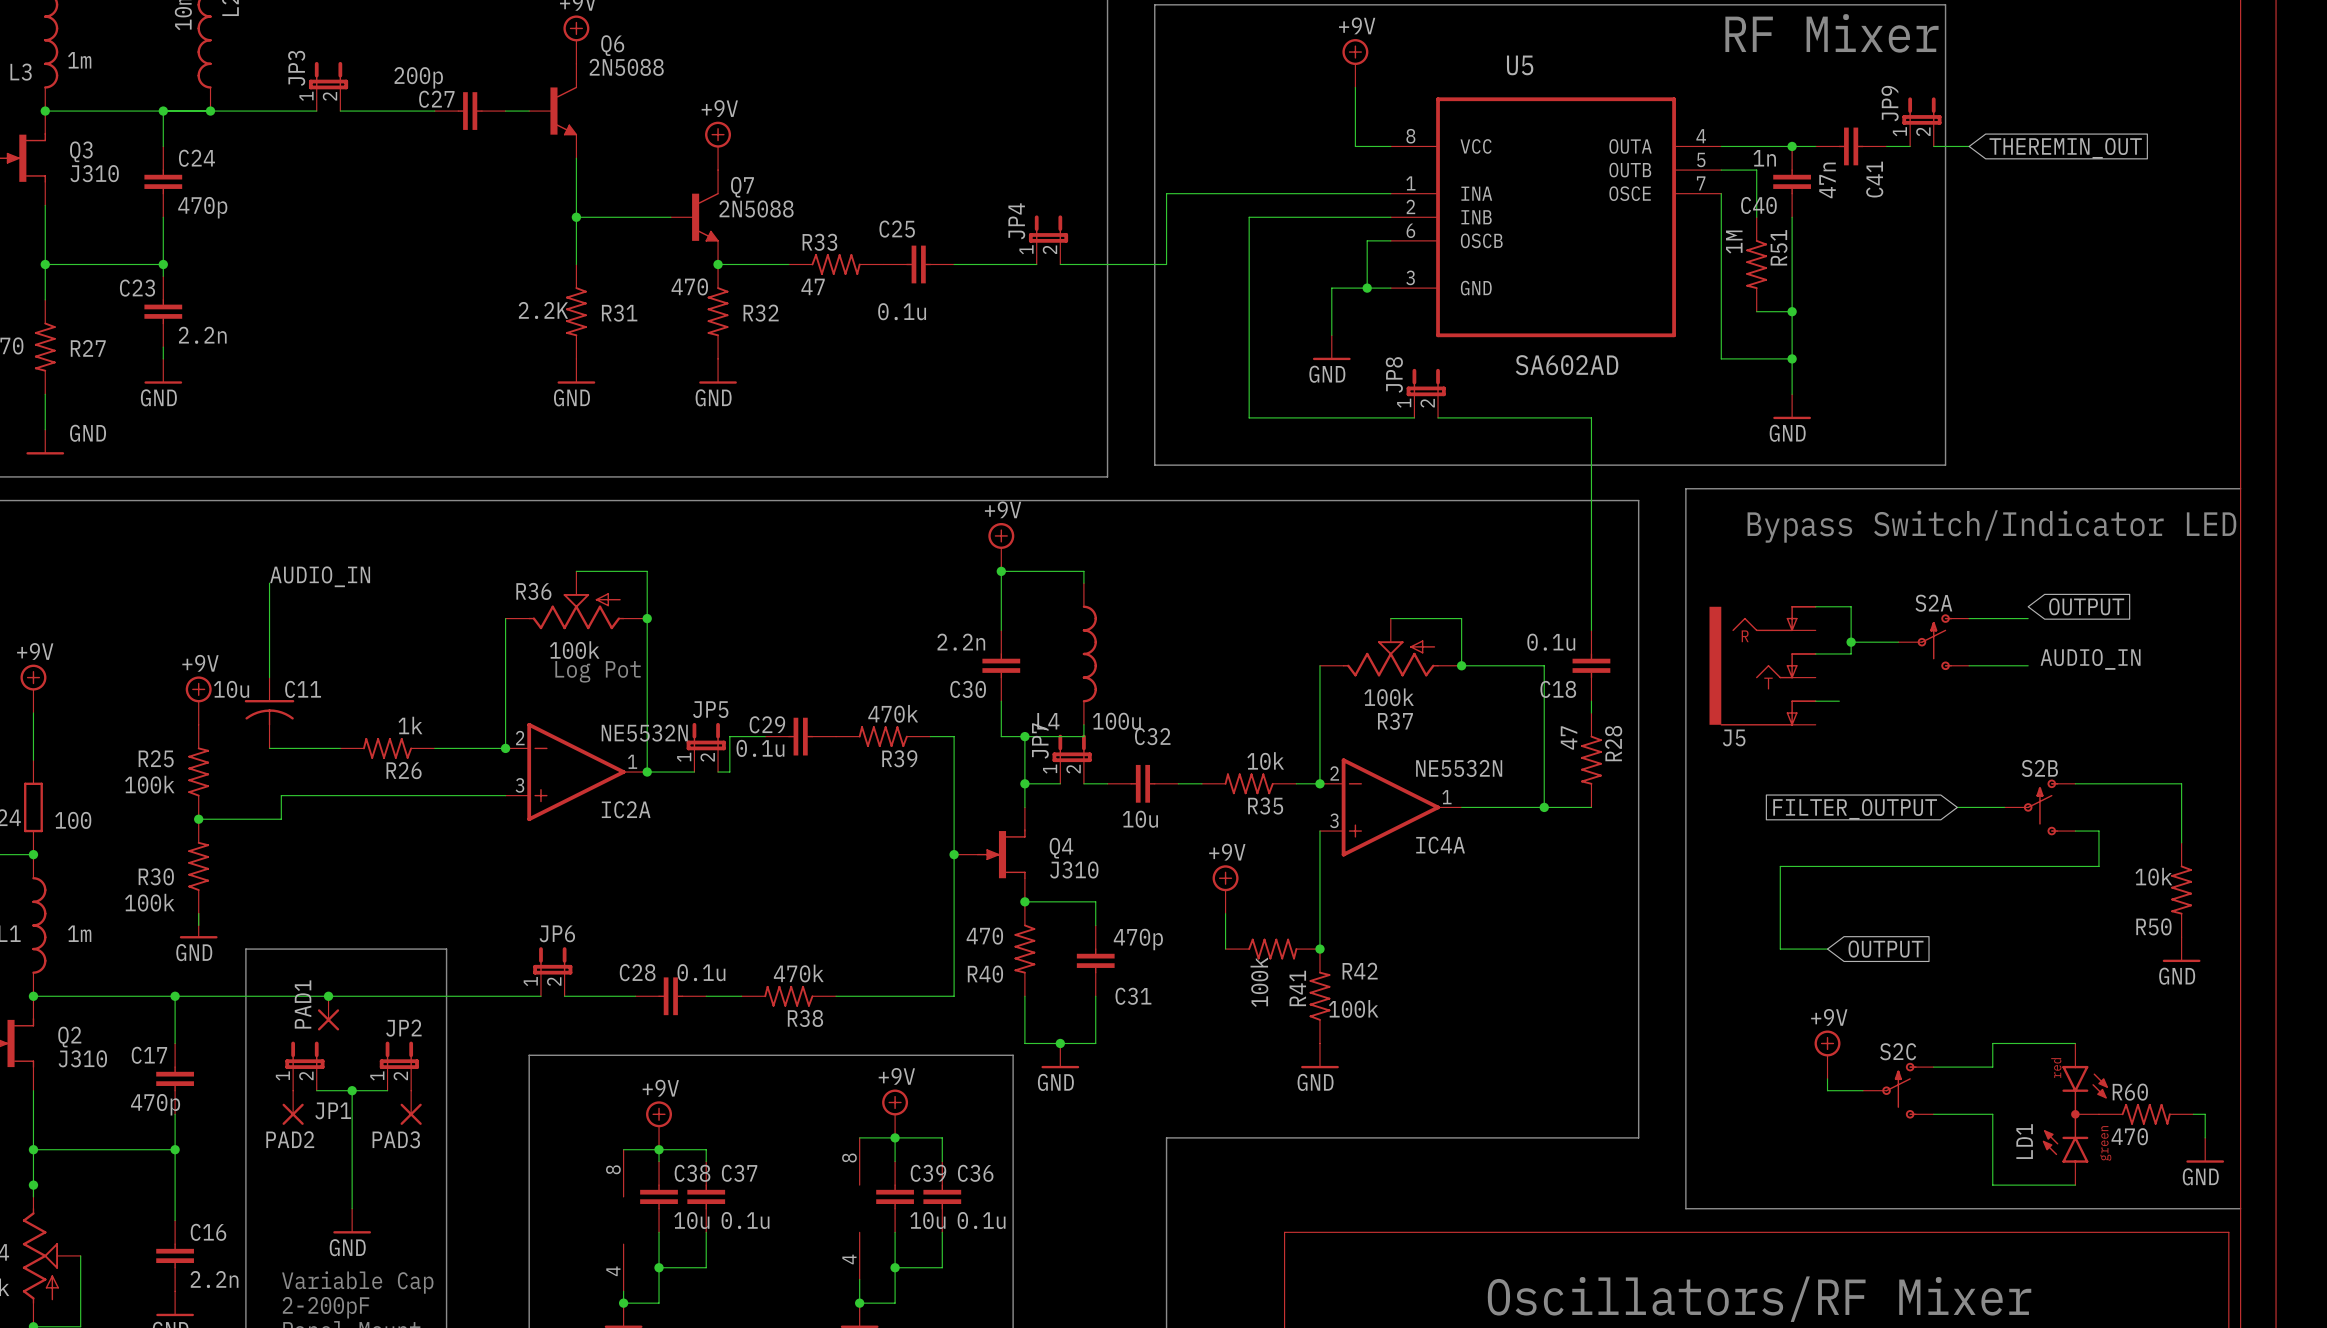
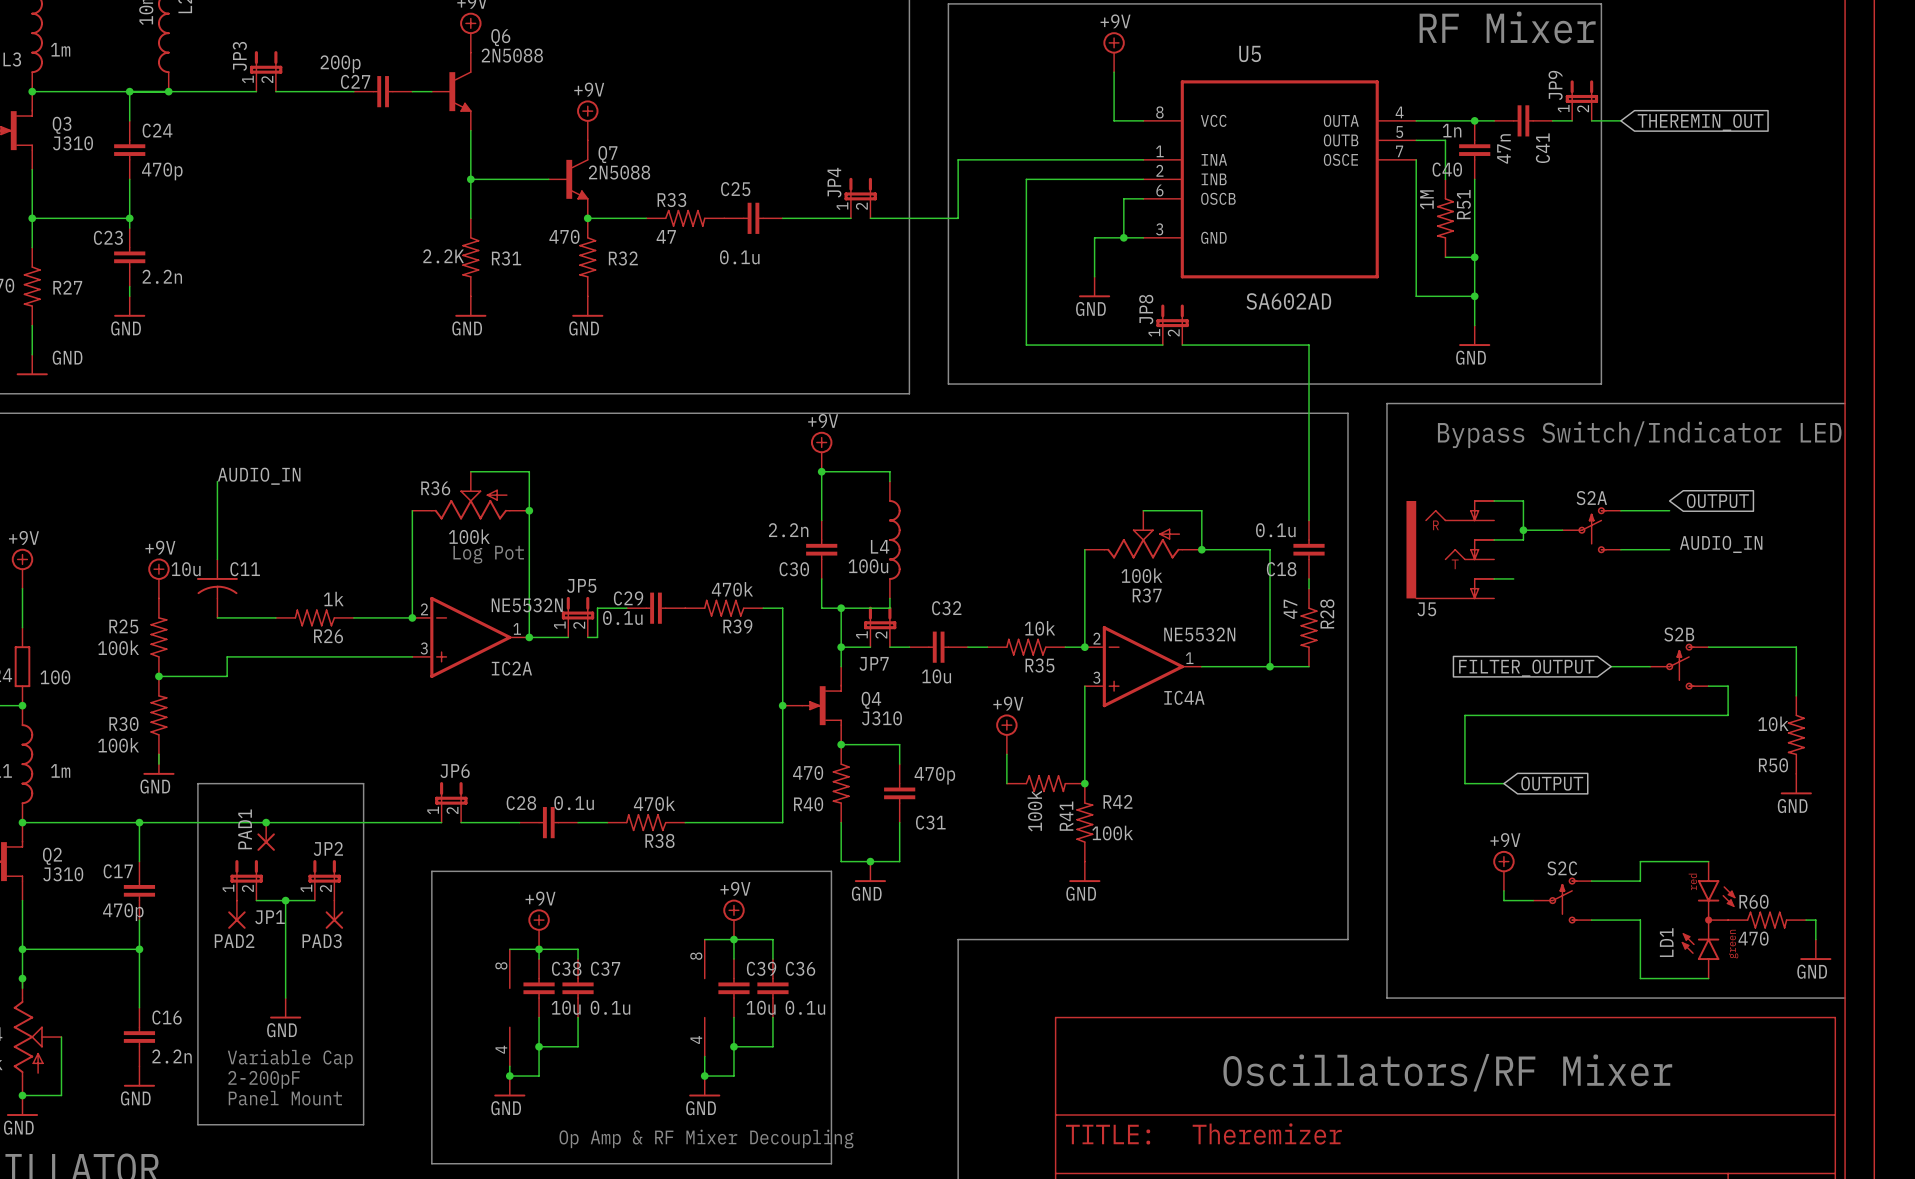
L4 name position: L4 (1048, 721) -> L4 (880, 546)
L4 value position: 100u (1116, 721) -> 100u (868, 566)
JP7 name rotation: 0° (1040, 740) -> 90° clockwise (874, 663)
JP7 name position: JP7 (1040, 740) -> JP7 (874, 663)

